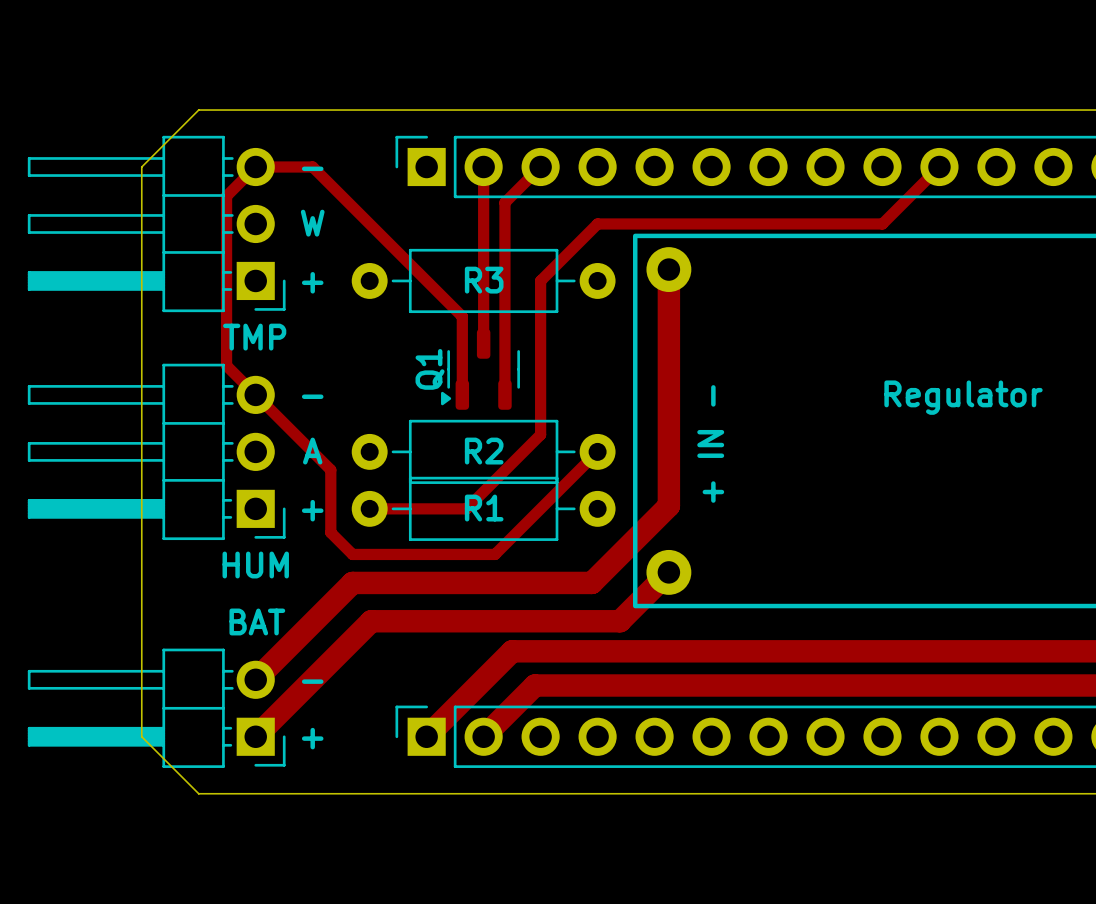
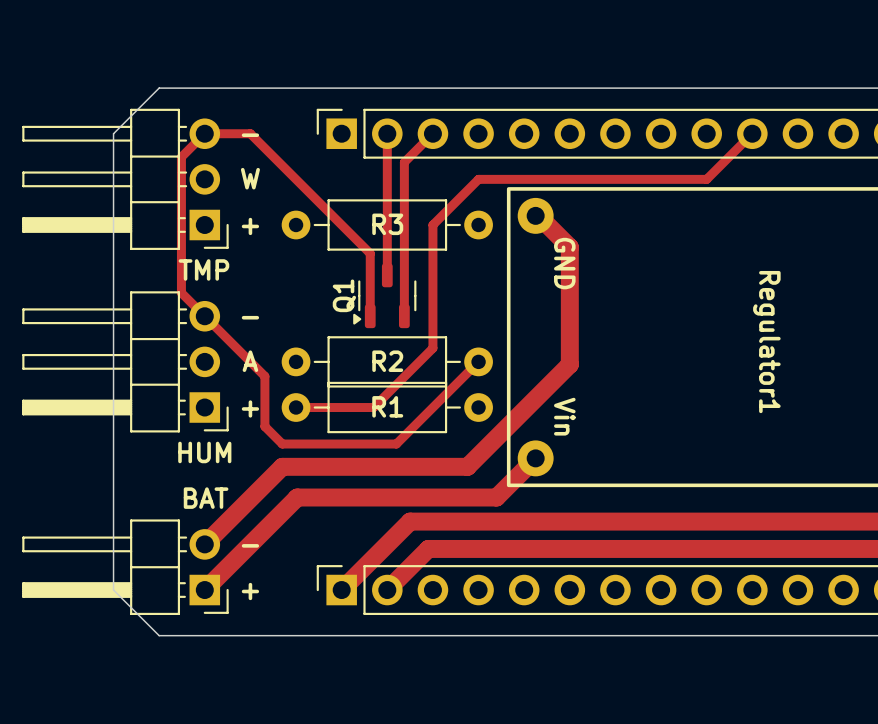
track: (668, 269) (668, 505) (591, 582) (583, 582) -> (534, 212) (569, 247) (569, 364) (467, 466)
Regulator text: none -> GND (564, 263)
Regulator name: Regulator (963, 397) -> Regulator1 (766, 342)
text: + IN - (710, 443) -> none
Regulator text: none -> Vin (564, 416)

